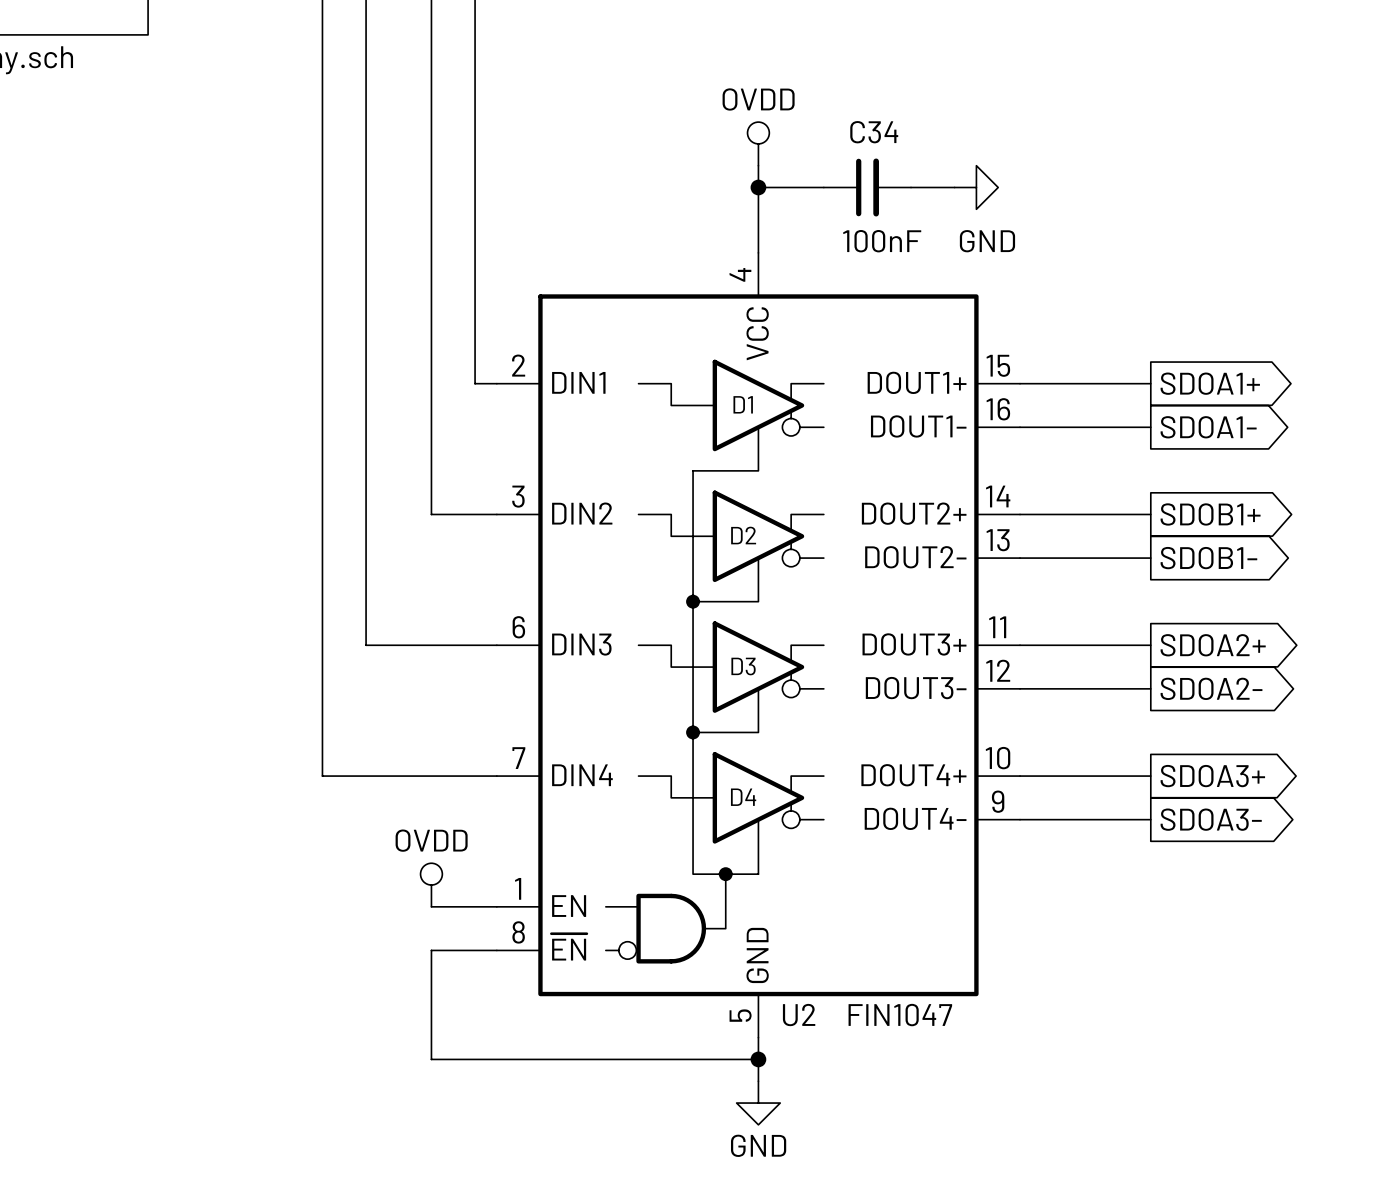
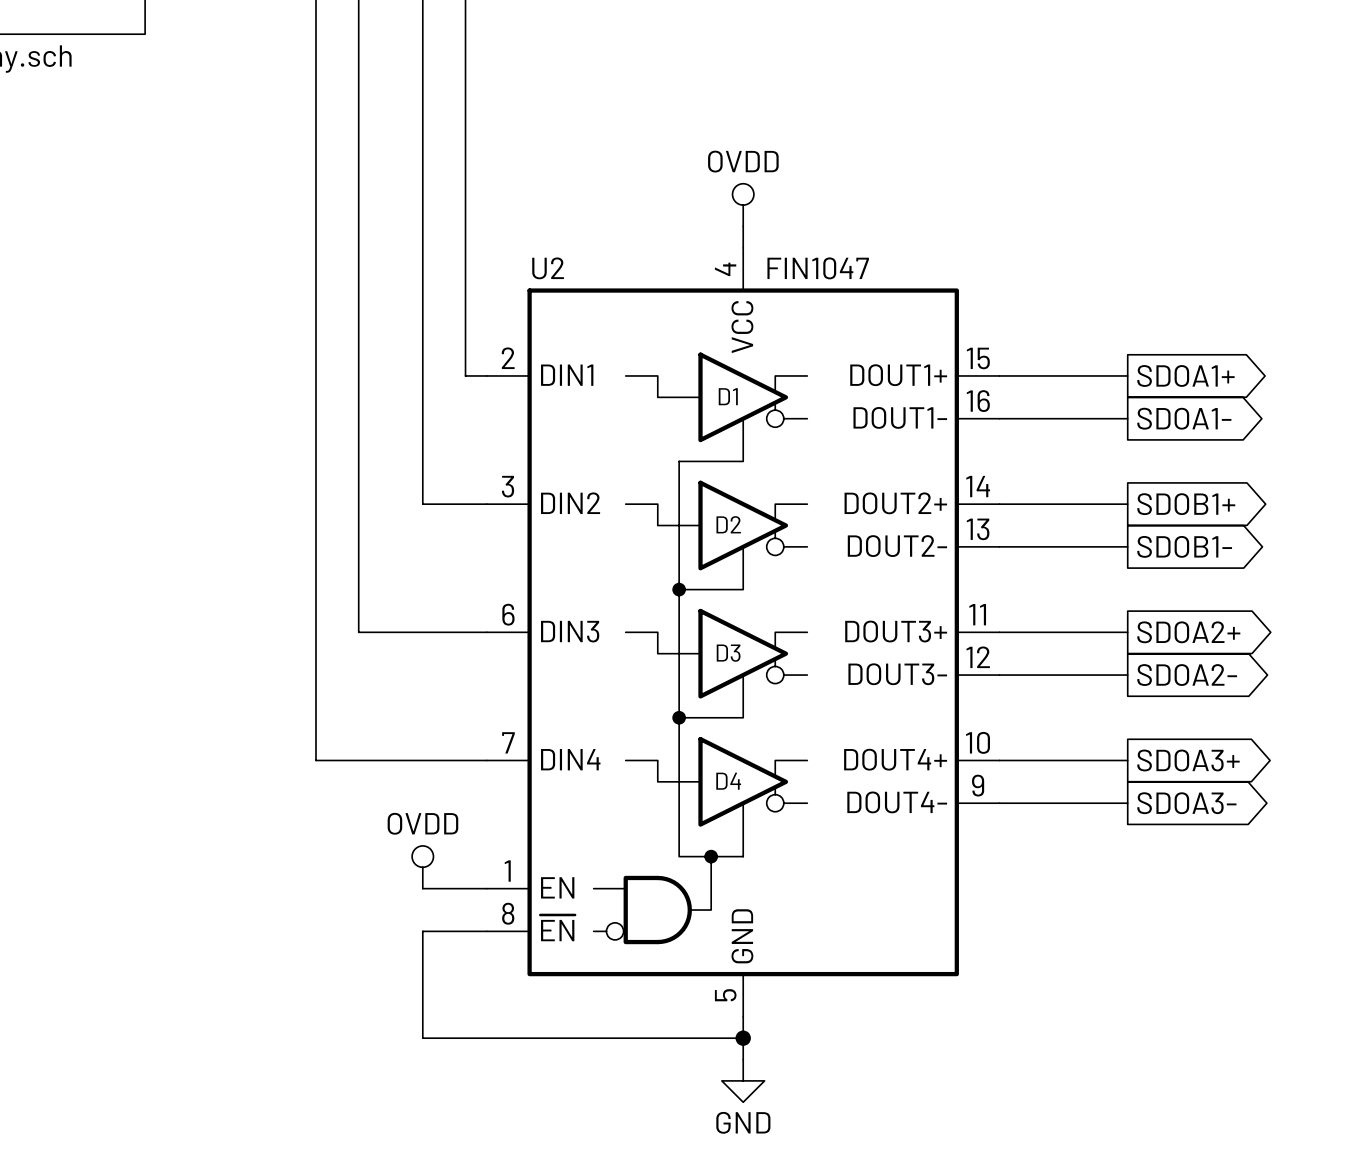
power symbol position: OVDD (758, 143) -> OVDD (743, 205)
wire: (758, 165) (758, 231) -> none
wire: (758, 187) (823, 187) -> none
junction: (758, 187) -> none
C34: 100nF (867, 187) -> none
wire: (911, 187) (954, 187) -> none
power symbol: GND (976, 187) -> none
U2 name position: U2 (799, 1015) -> U2 (548, 268)
U2 value position: FIN1047 (900, 1015) -> FIN1047 (818, 268)

